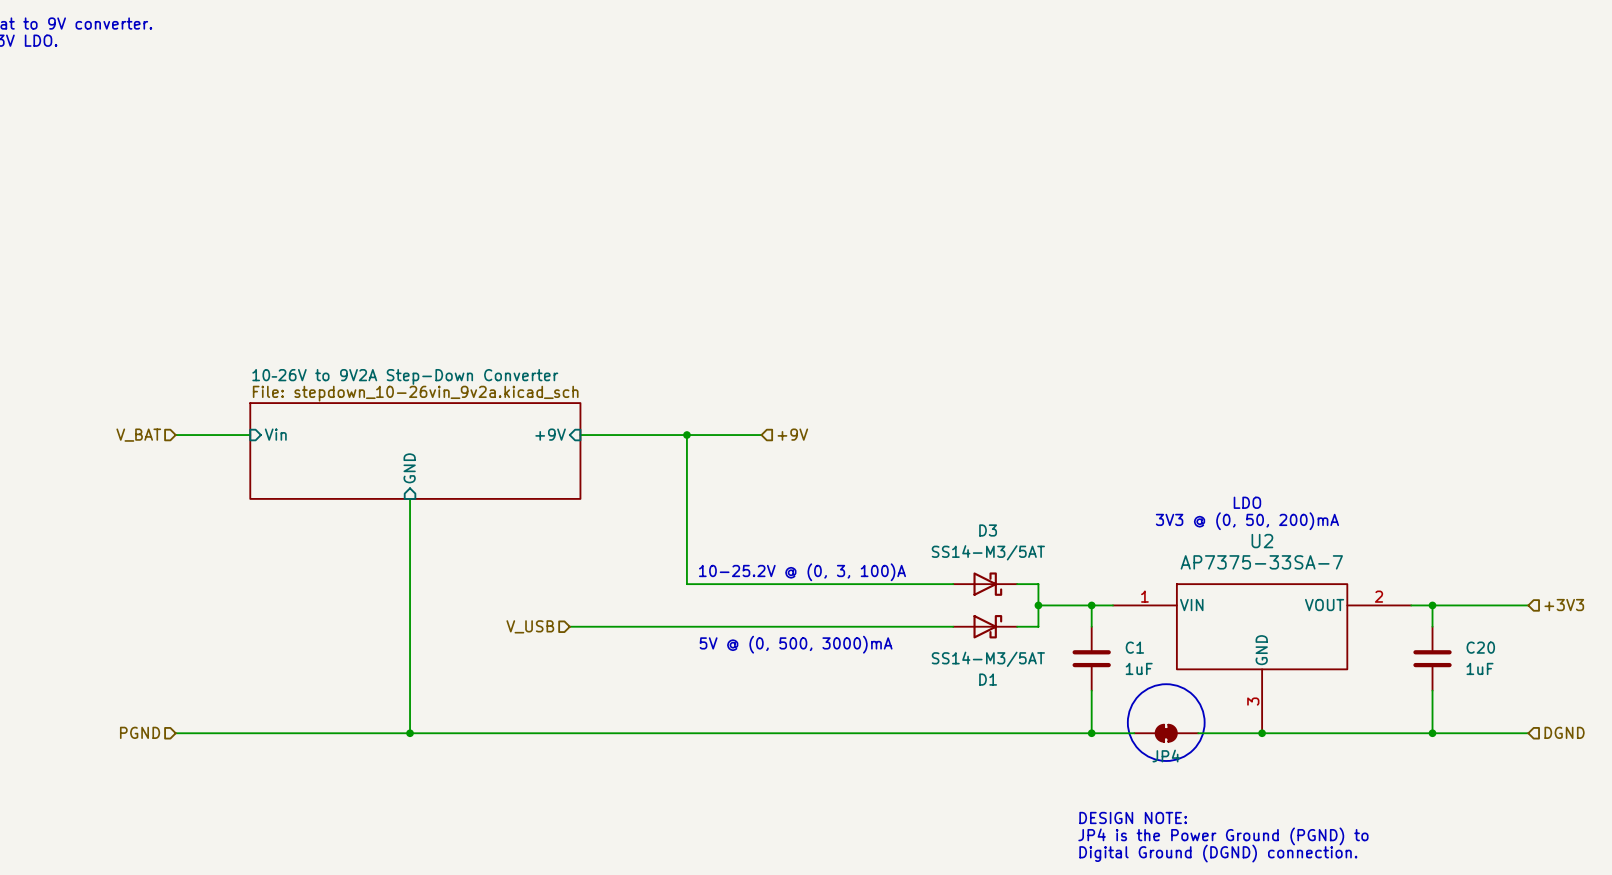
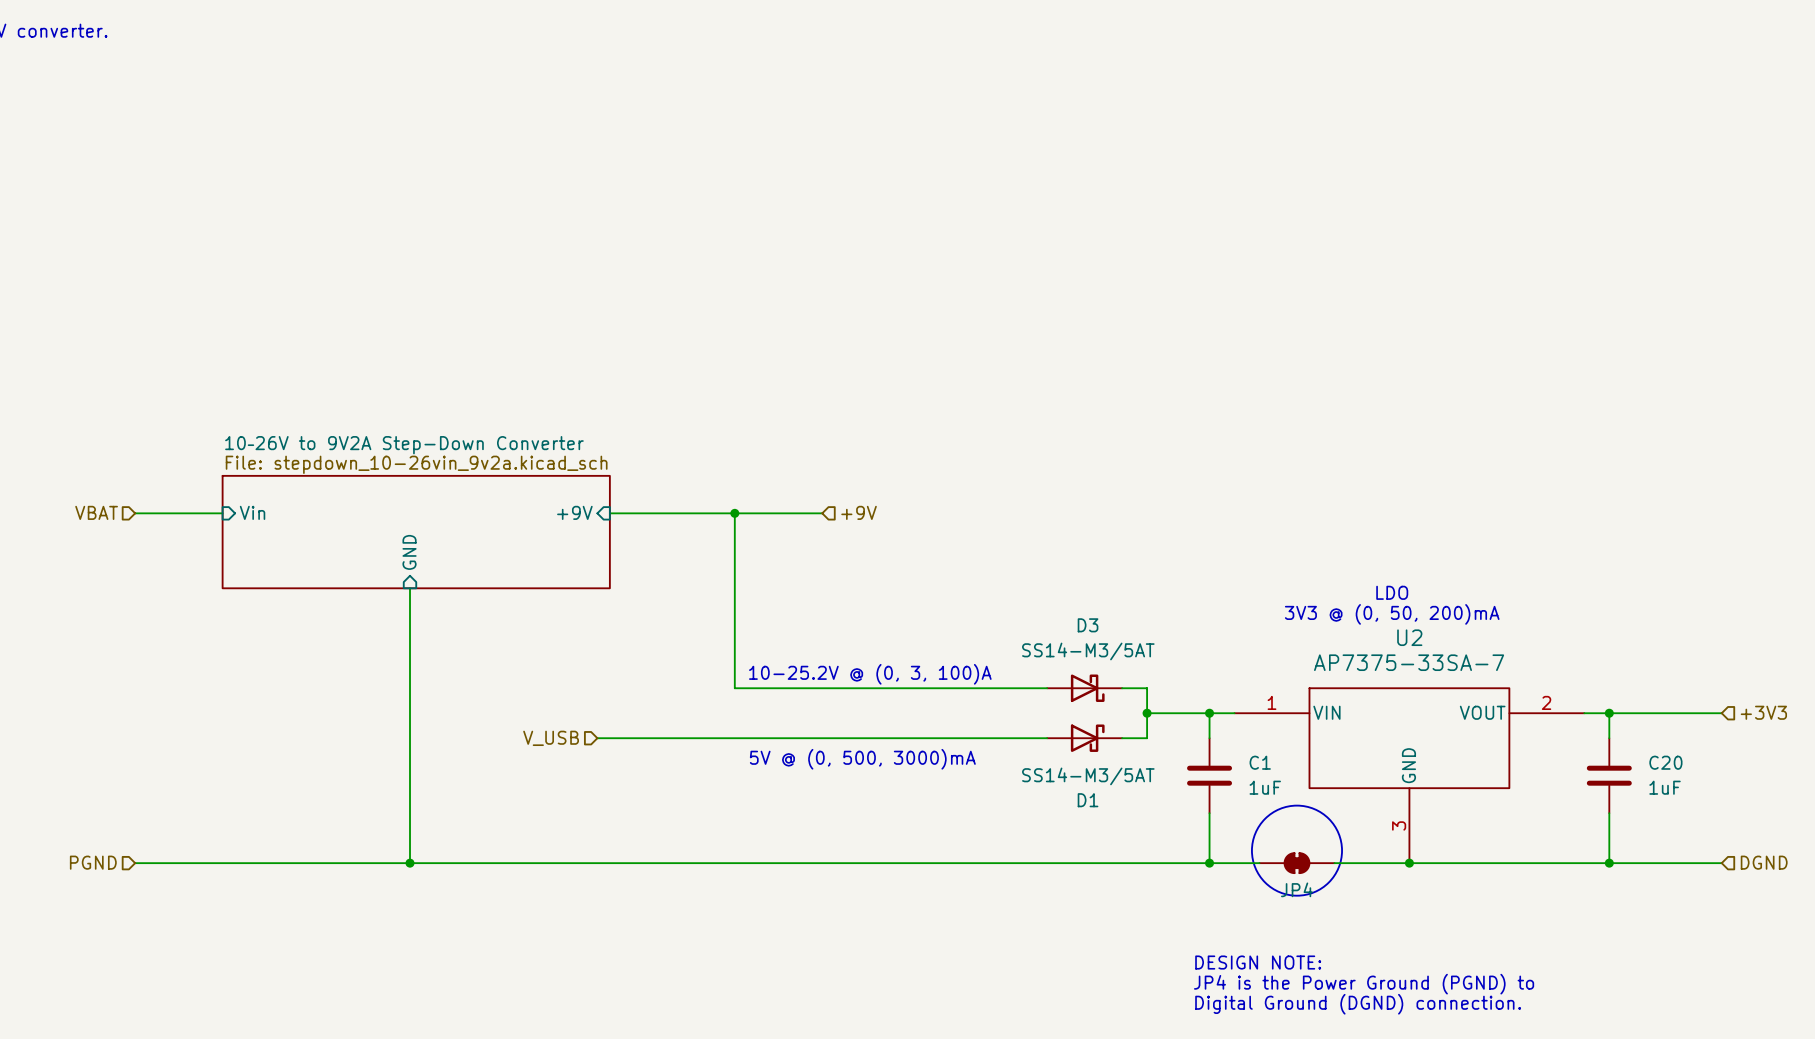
hierarchical label: V_BAT (138, 435) -> VBAT (96, 512)

